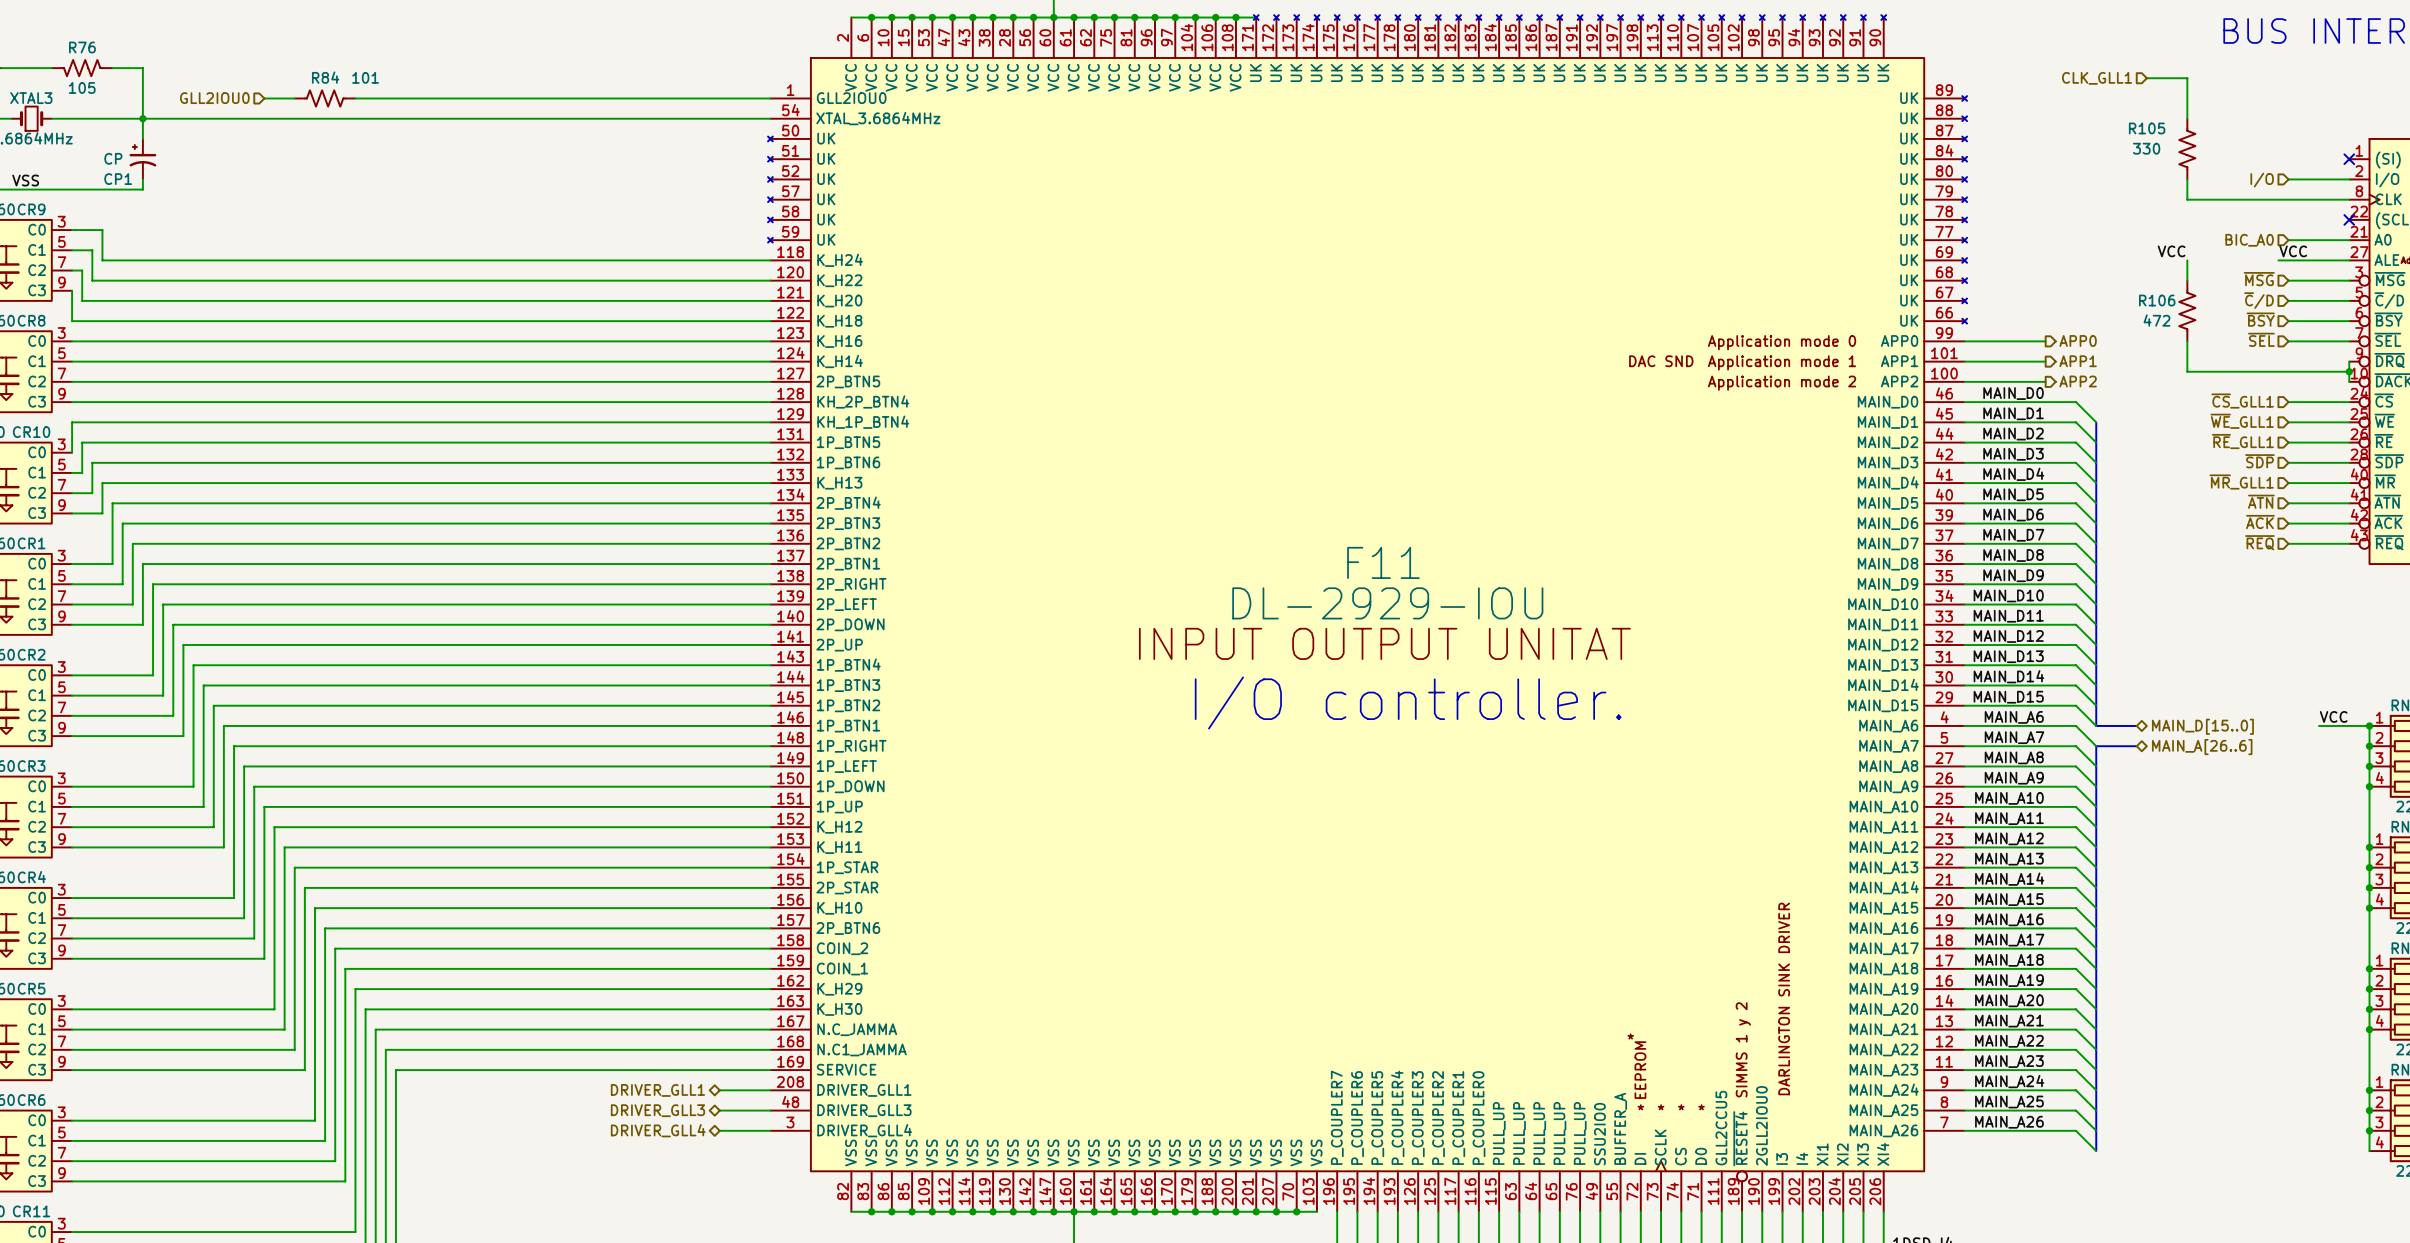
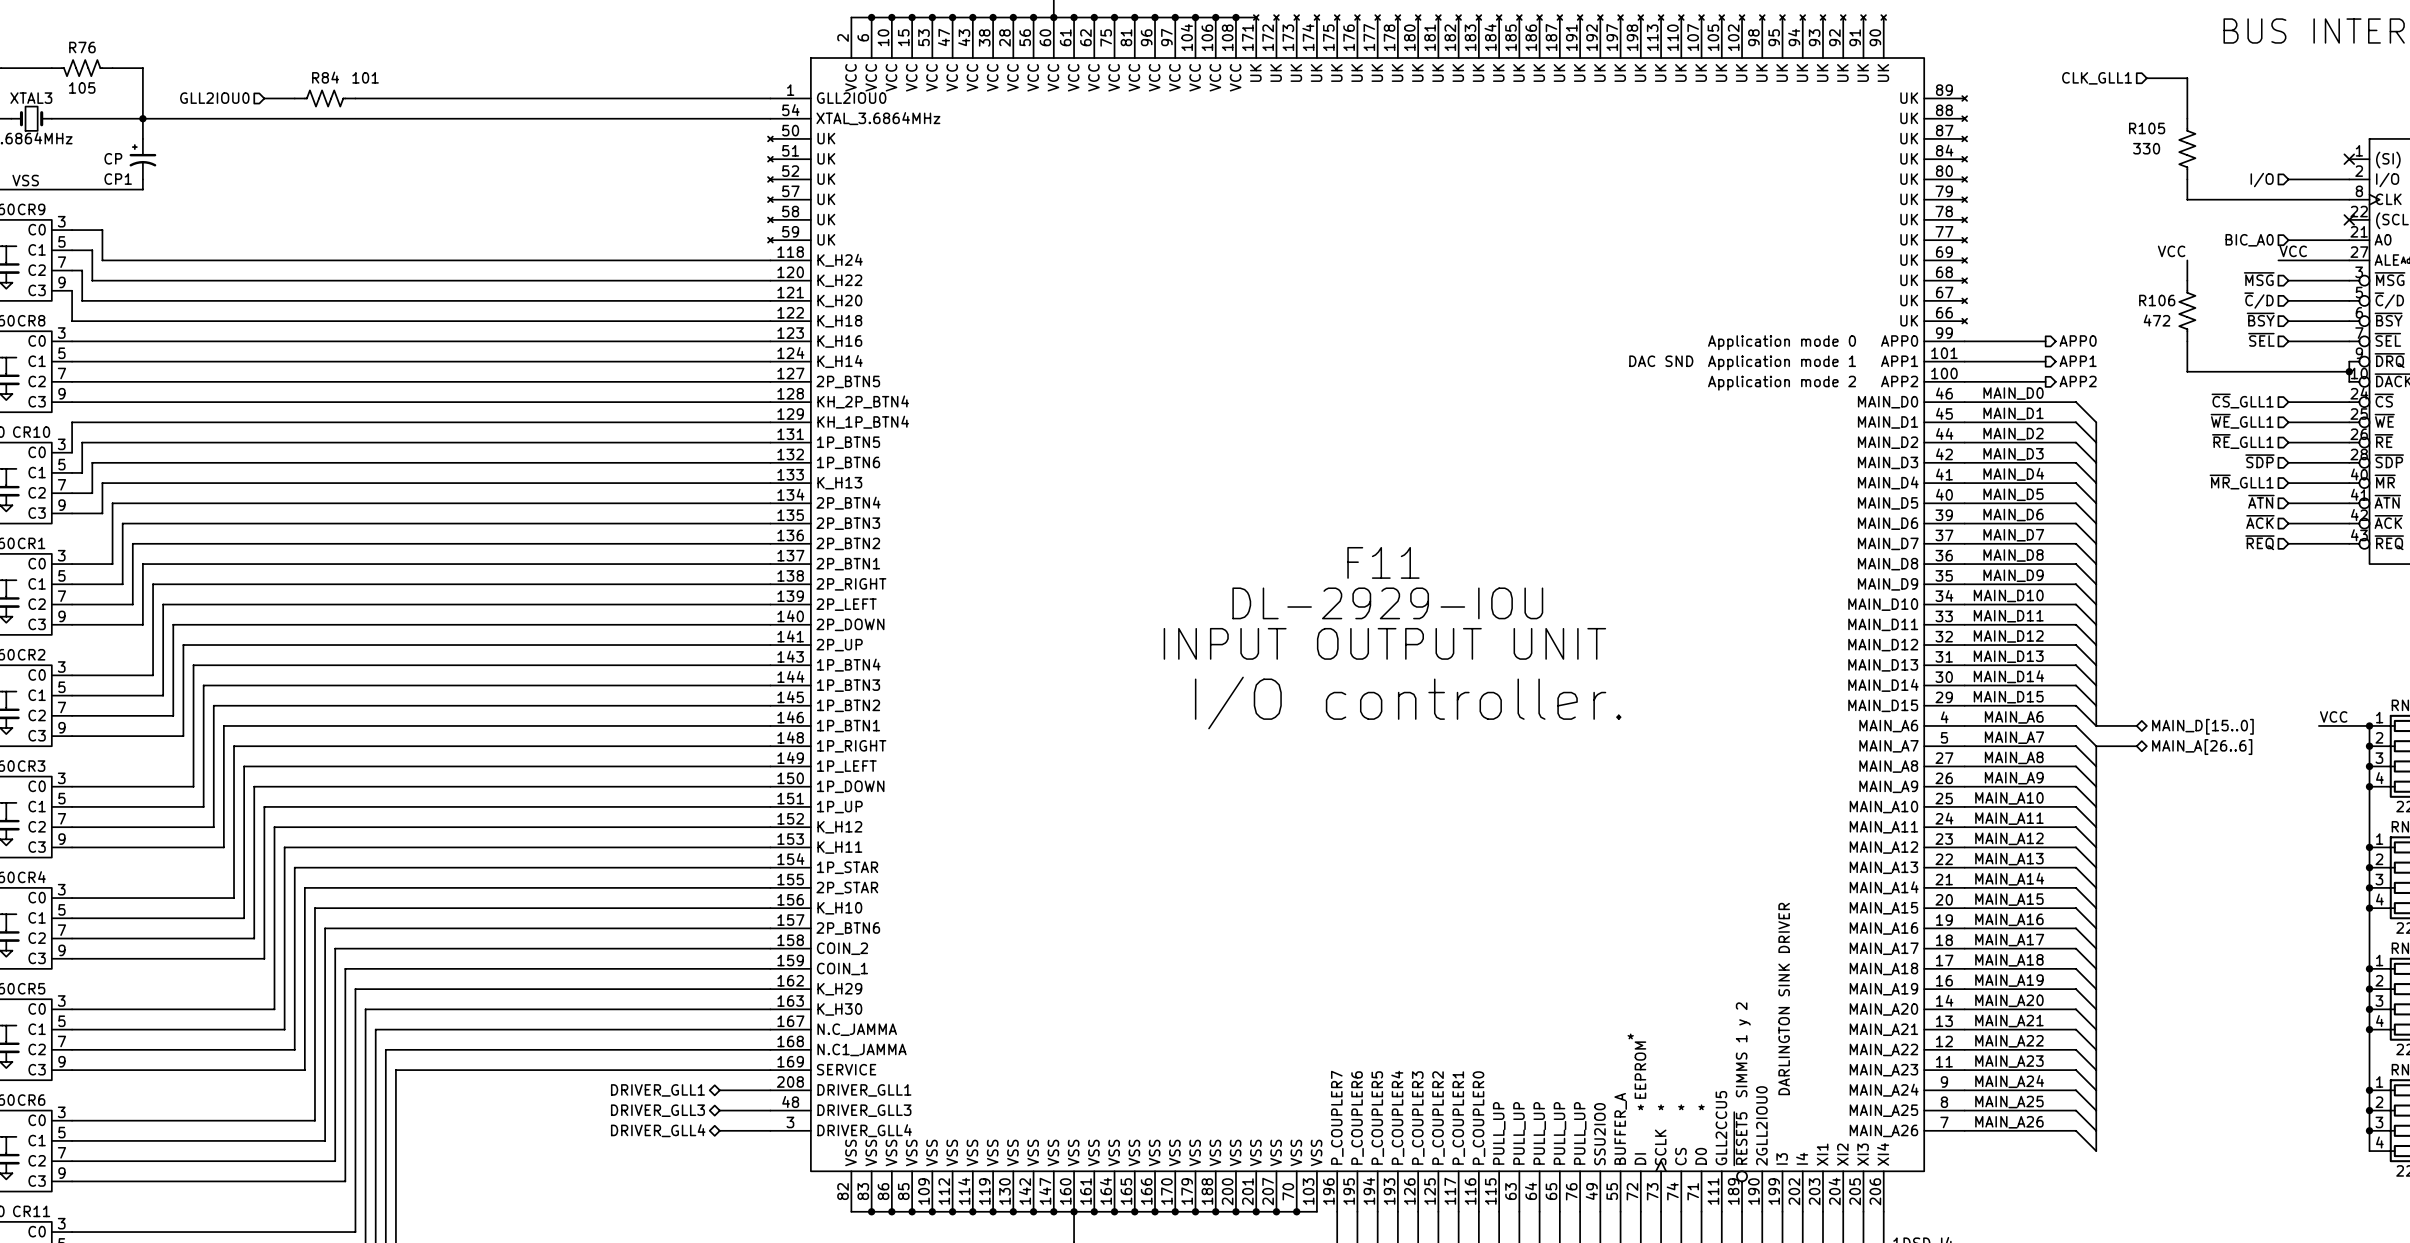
F11 text: INPUT OUTPUT UNITAT (1384, 643) -> INPUT OUTPUT UNIT (1384, 643)
F11 pin name: ~{RESET4} (1740, 1138) -> ~{RESET5} (1740, 1138)

